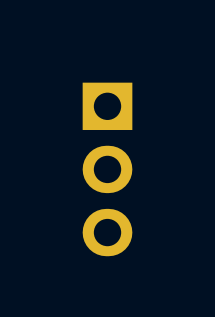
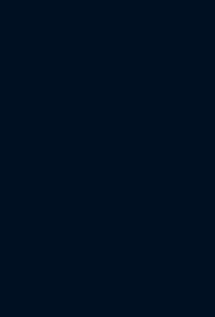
part: (107, 169) -> none

